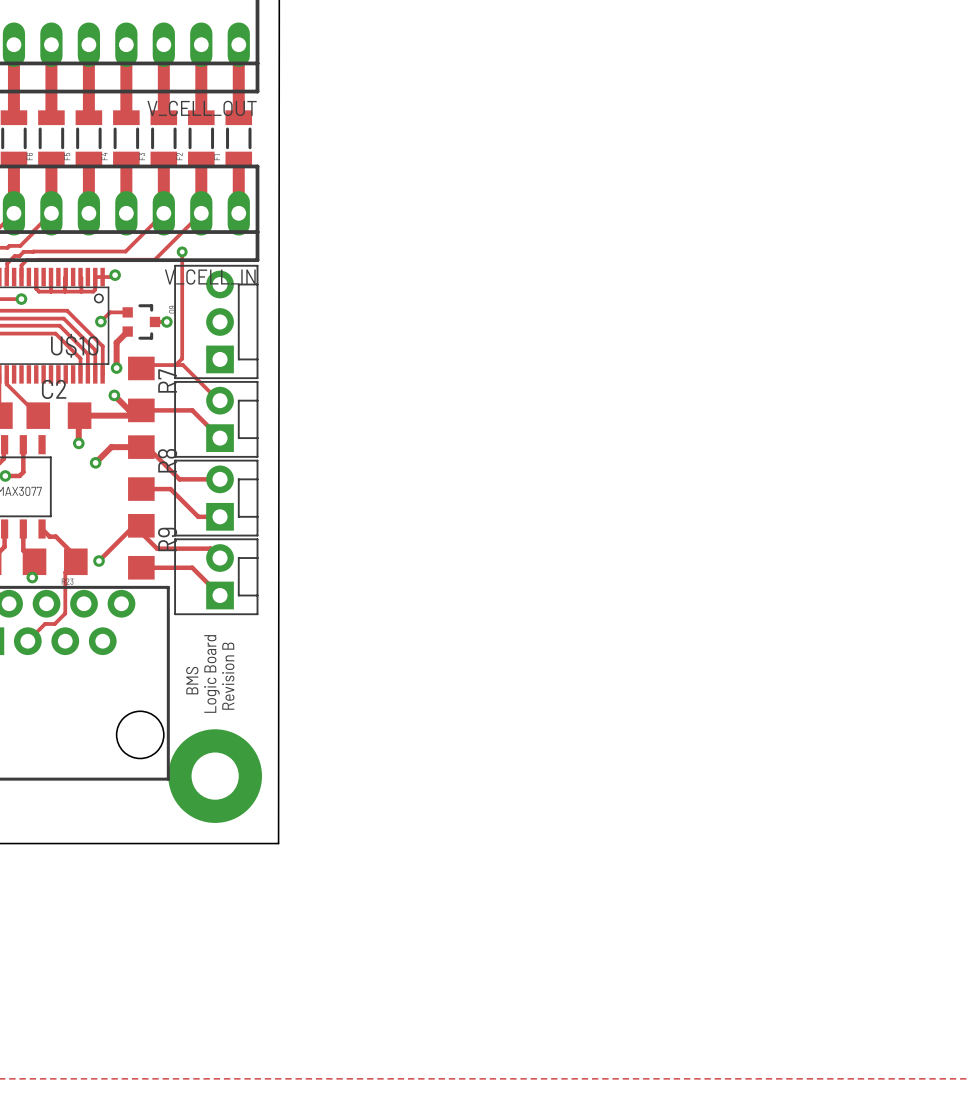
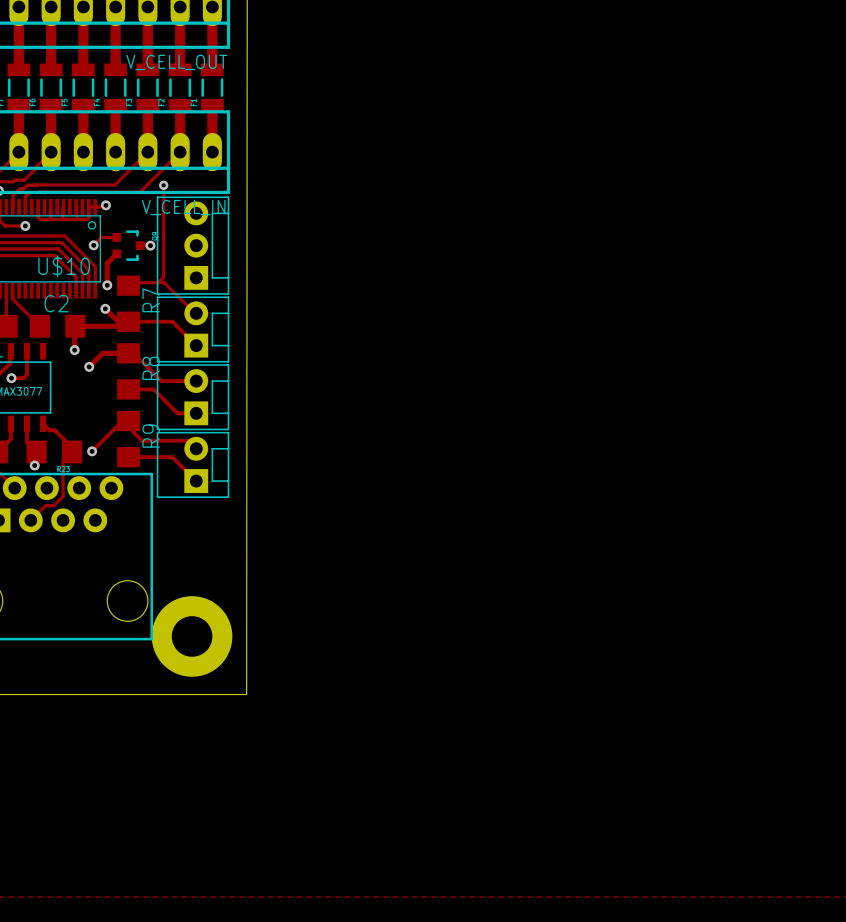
text: Logic Board (211, 673) -> none
text: Revision B (228, 676) -> none
text: BMS (192, 680) -> none

